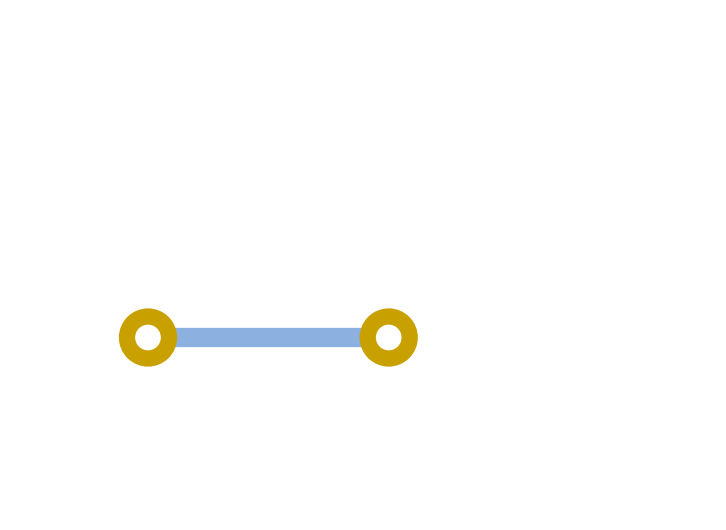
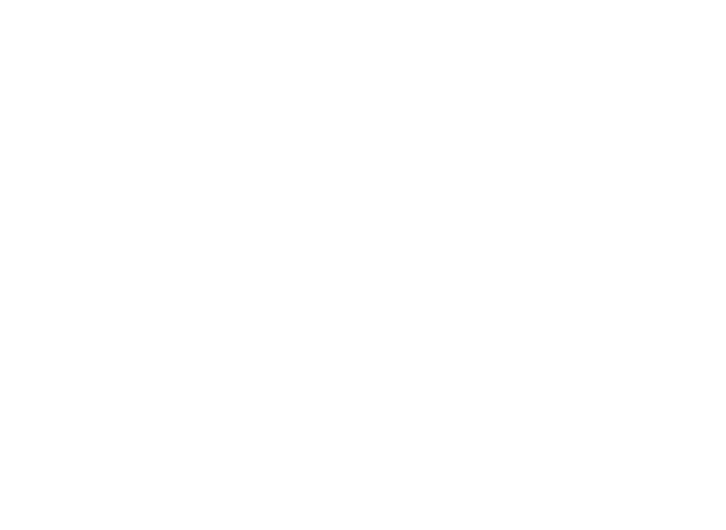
part: (268, 337) -> none

